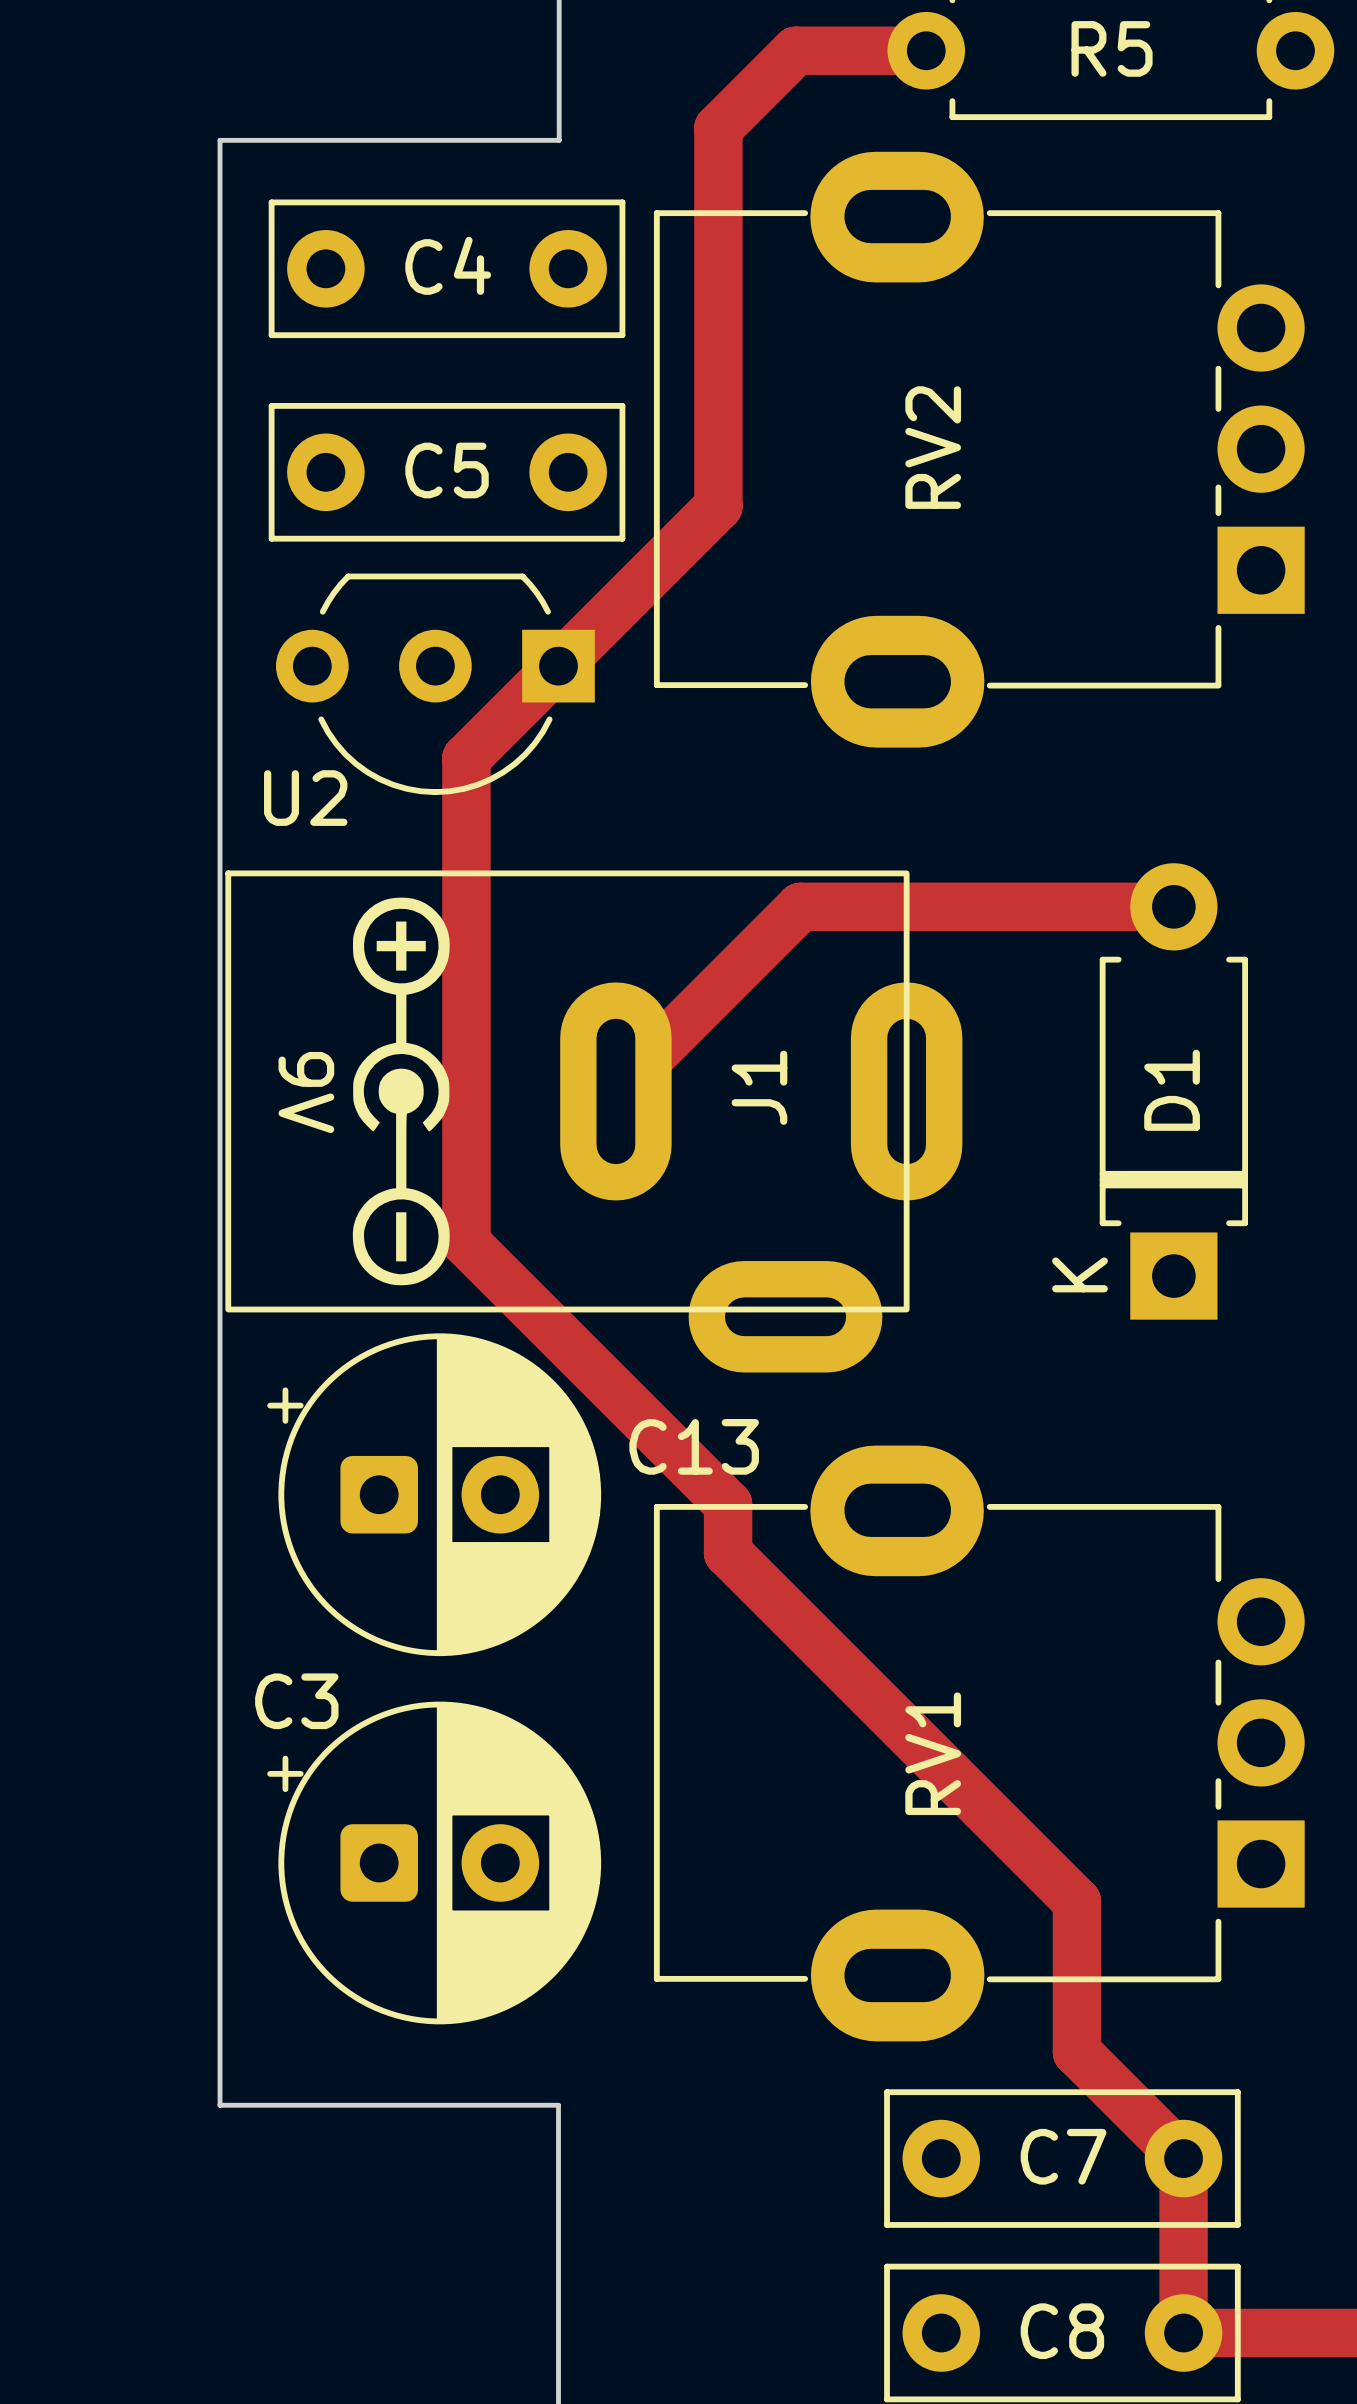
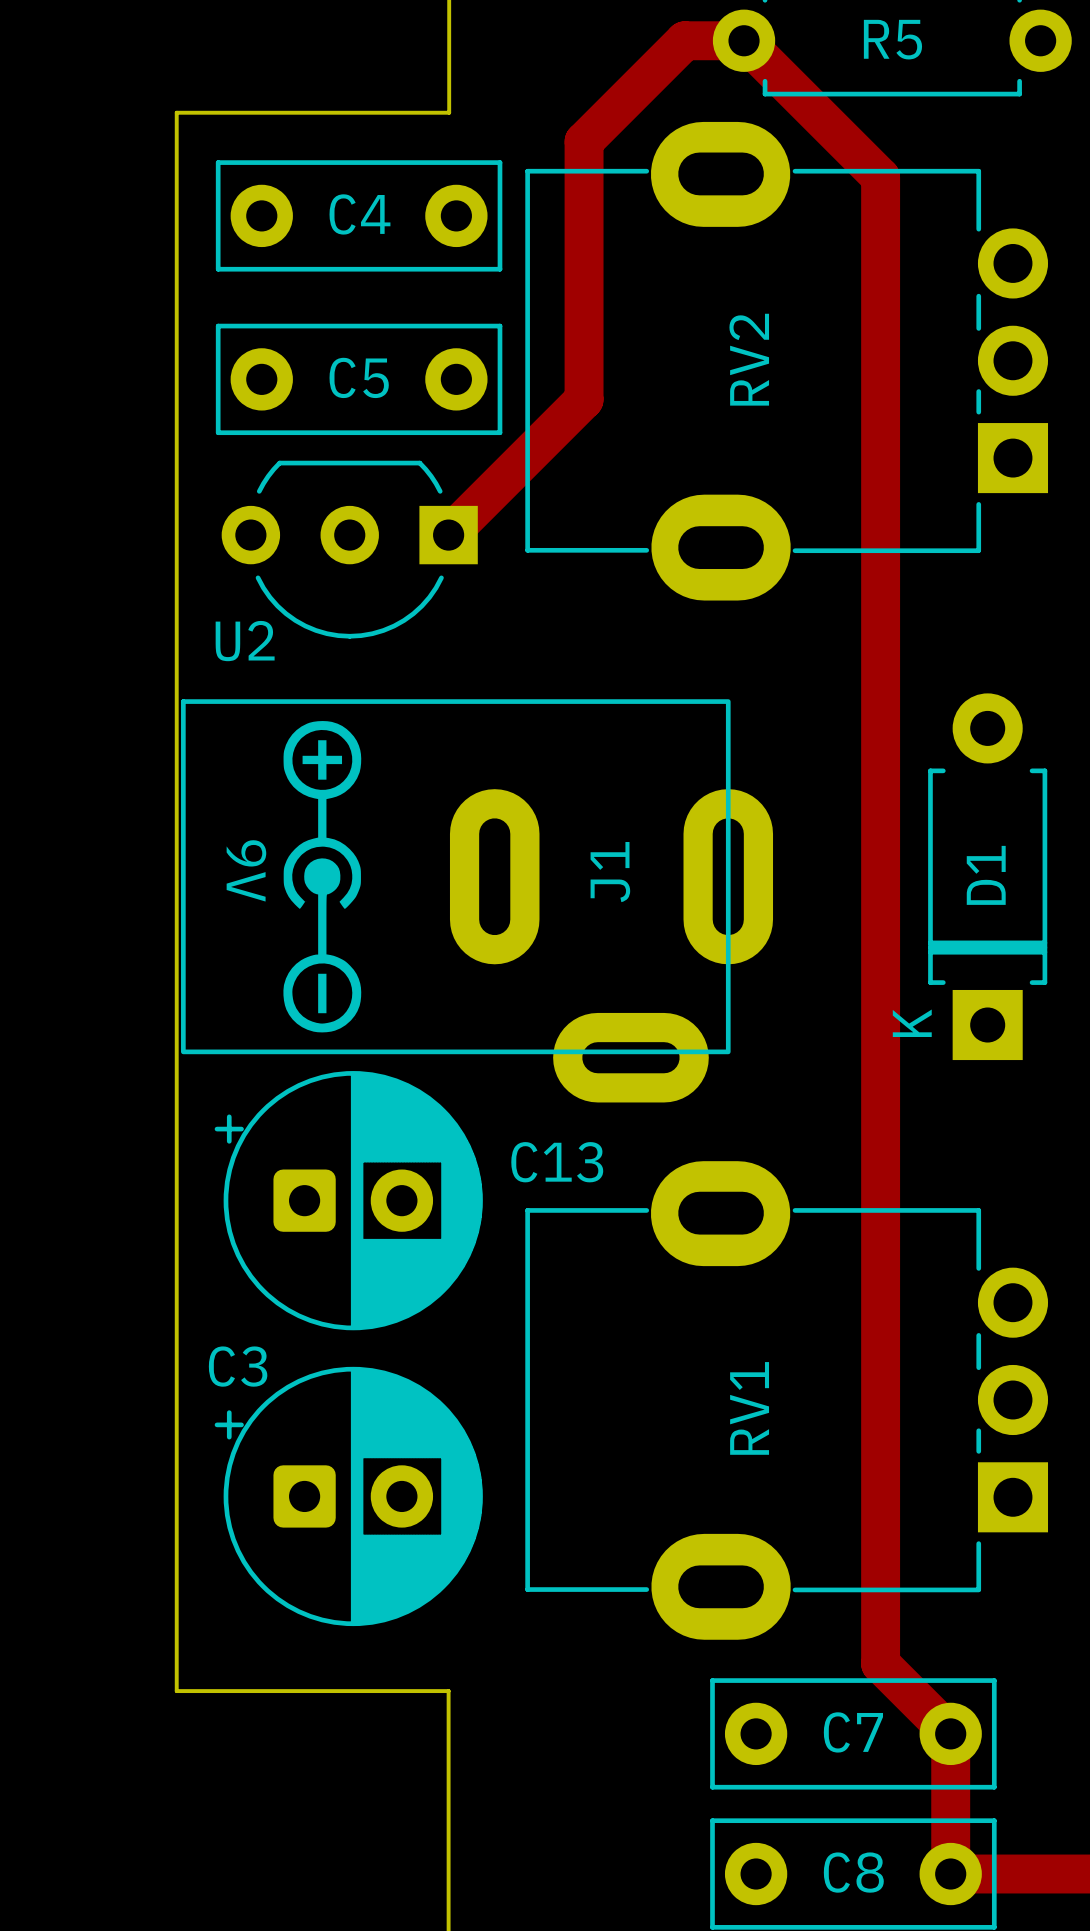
track: (852, 50) (795, 50) (718, 128) (718, 506) -> (684, 40) (584, 141) (584, 399) (577, 406)
track: (558, 666) (466, 758) (466, 1242) (728, 1504) (728, 1552) (1076, 1901) (1076, 2051) (1096, 2071) -> (744, 40) (880, 177) (880, 1663)
track: (1173, 906) (800, 906) (615, 1091) -> none
D1 position: (1173, 1091) -> (987, 876)

